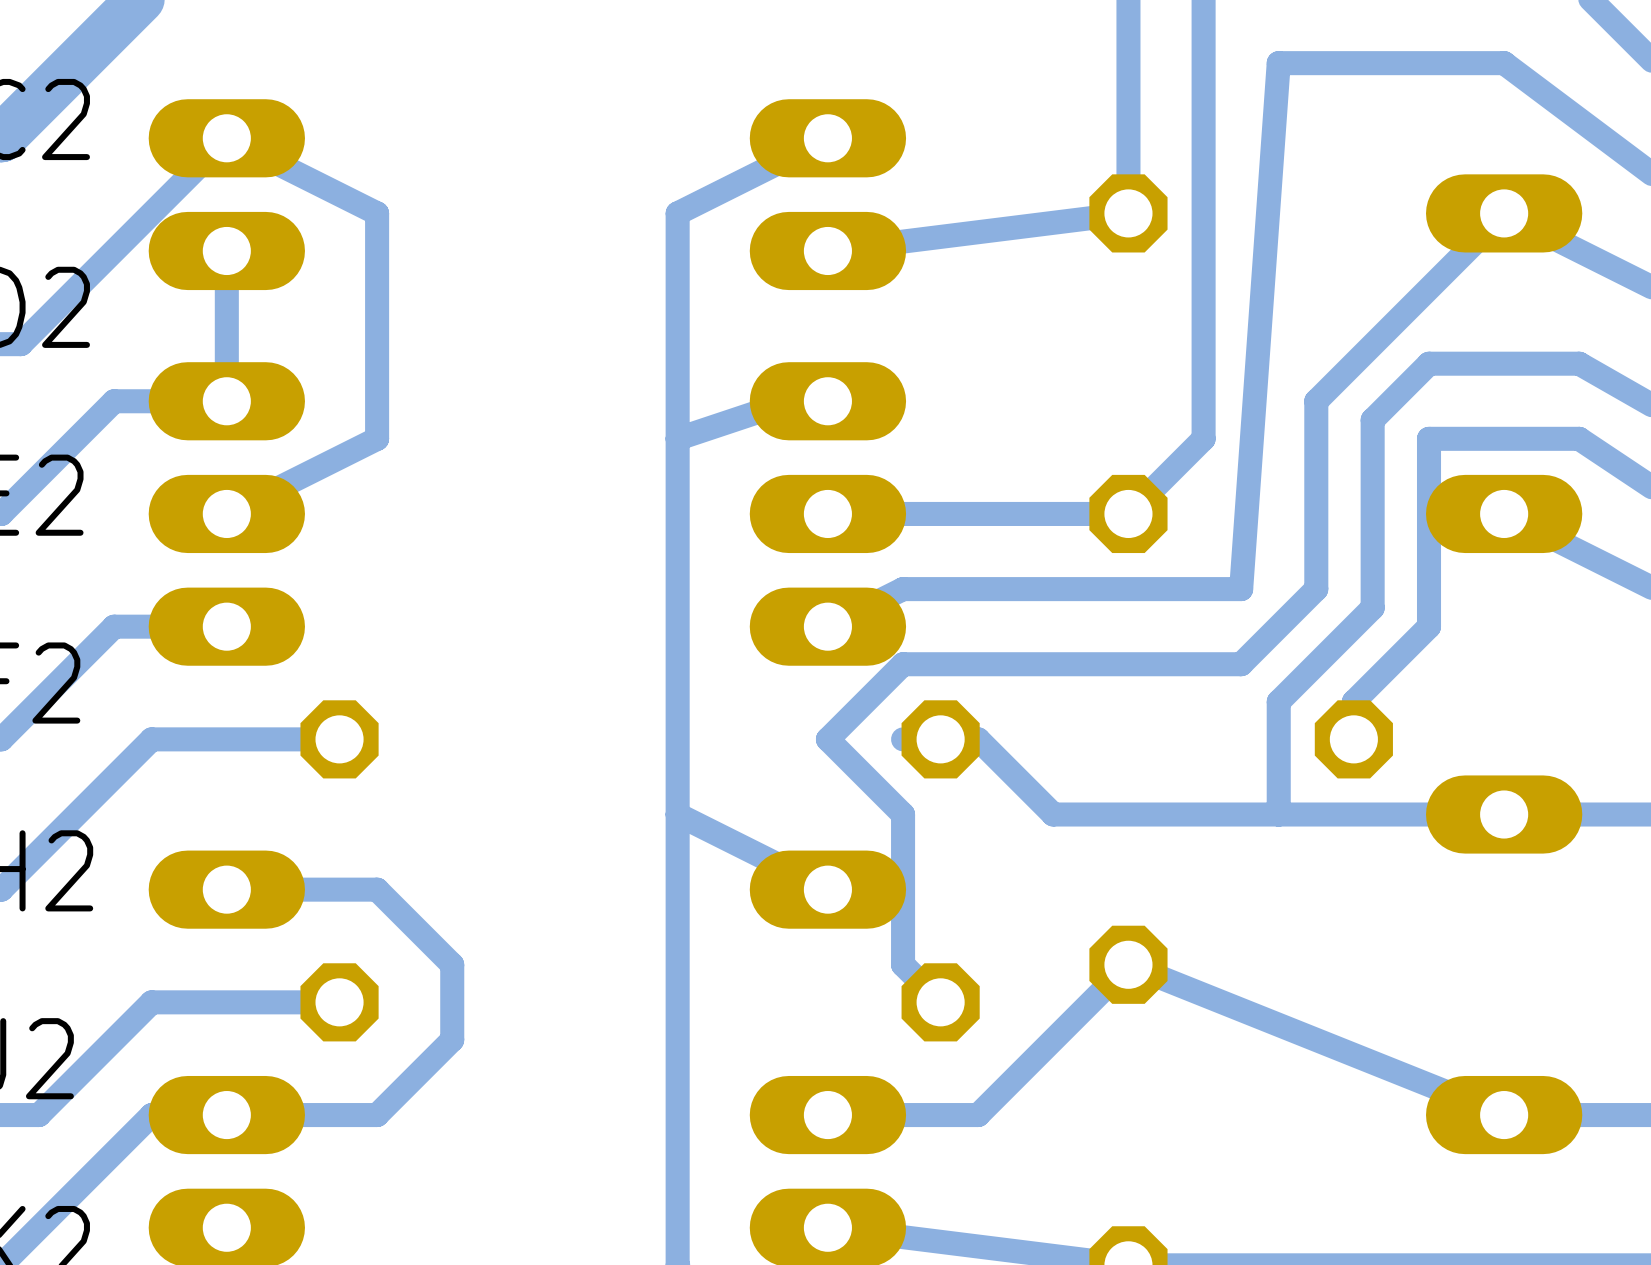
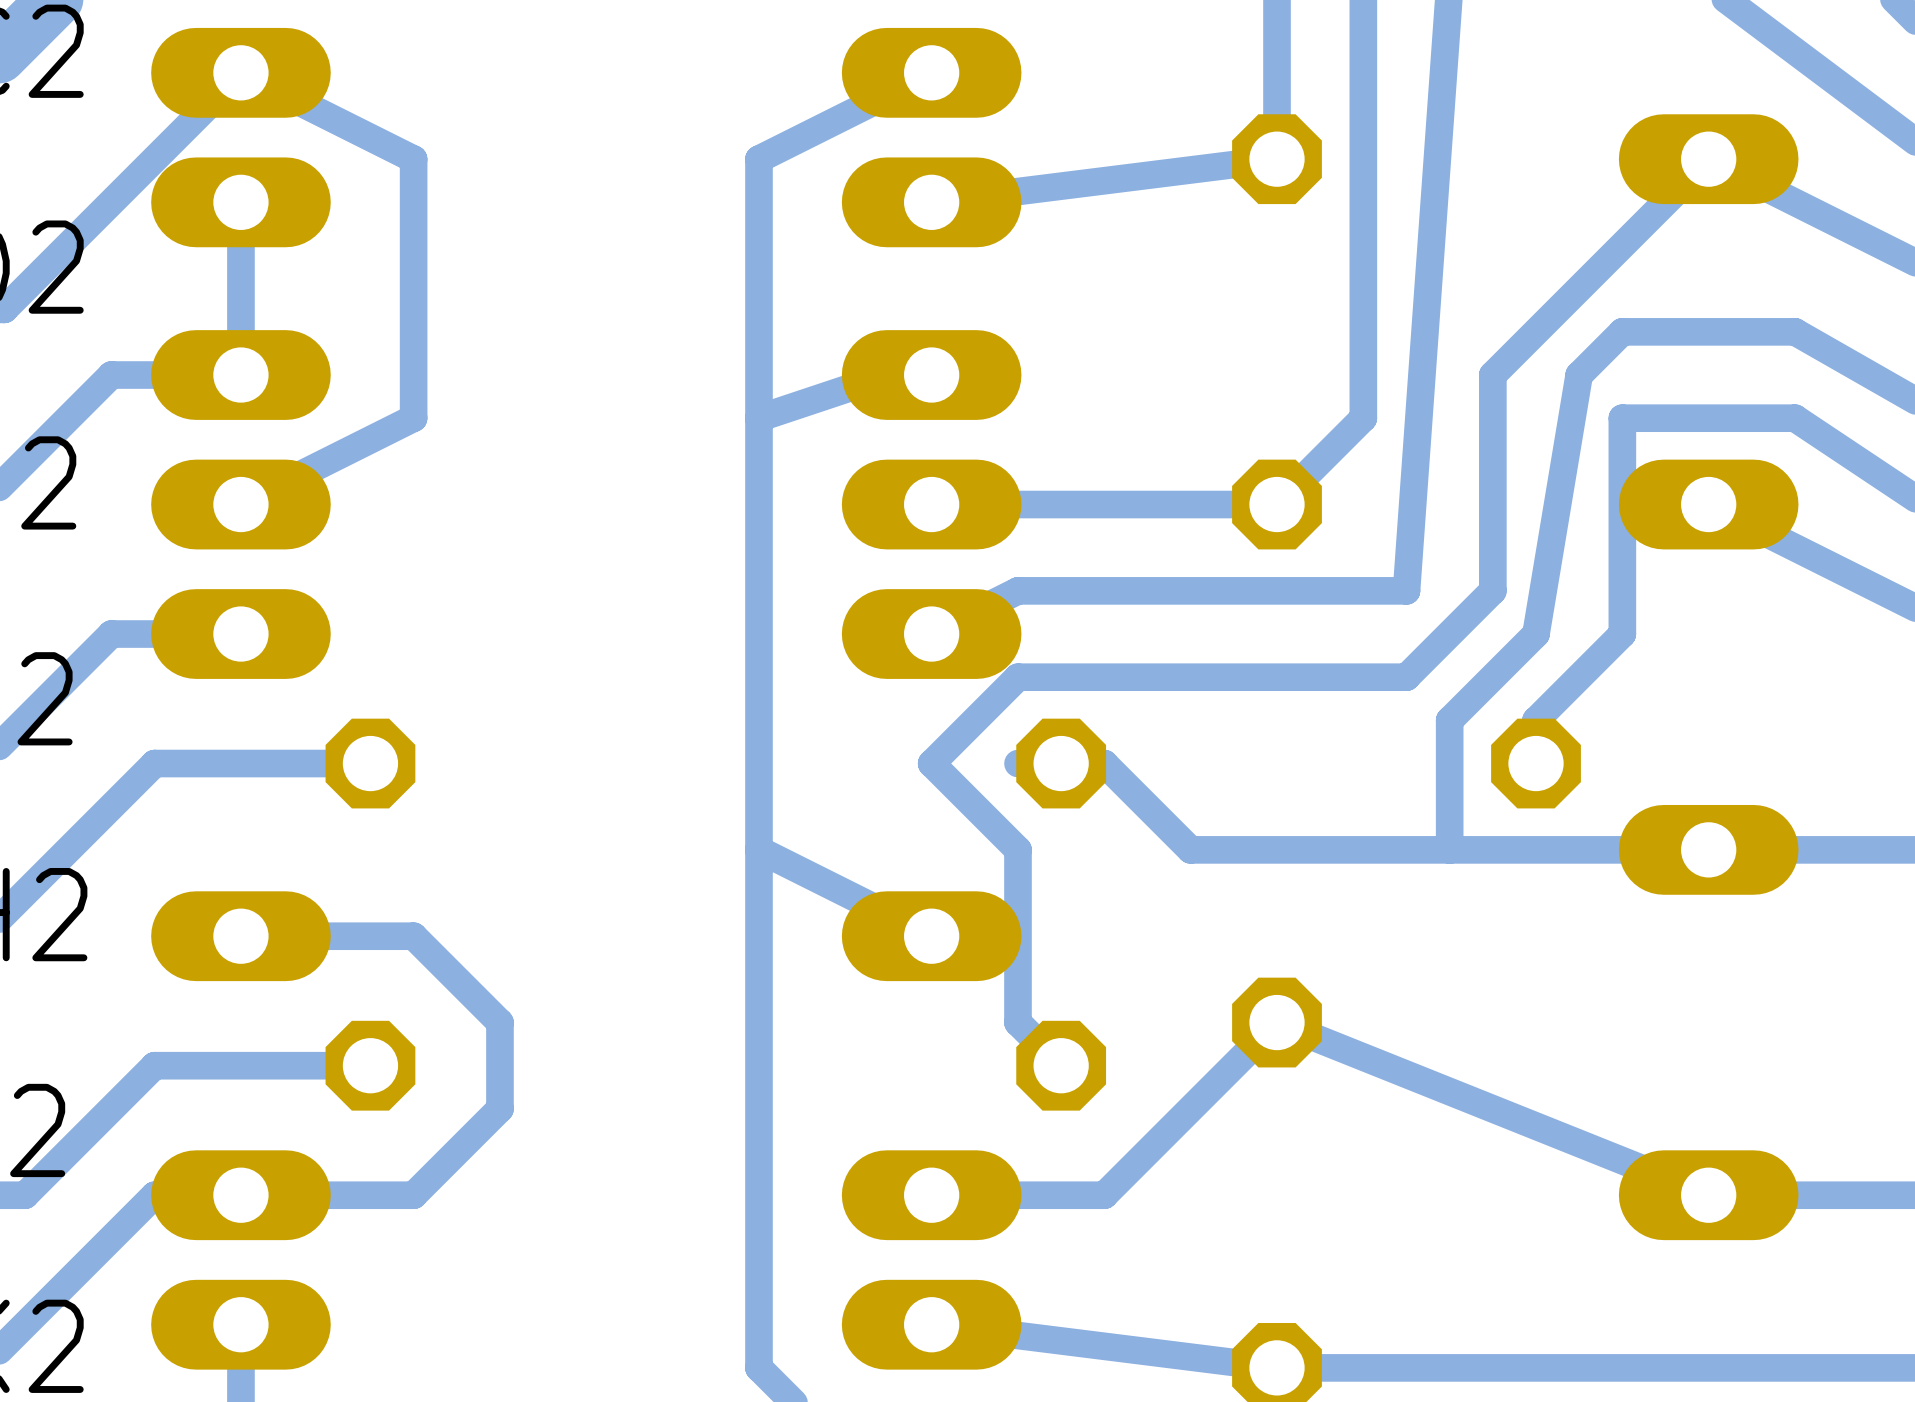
bottom track: (1391, 401) (1372, 420) (1372, 607) (1353, 626) -> (1579, 375) (1536, 634)

